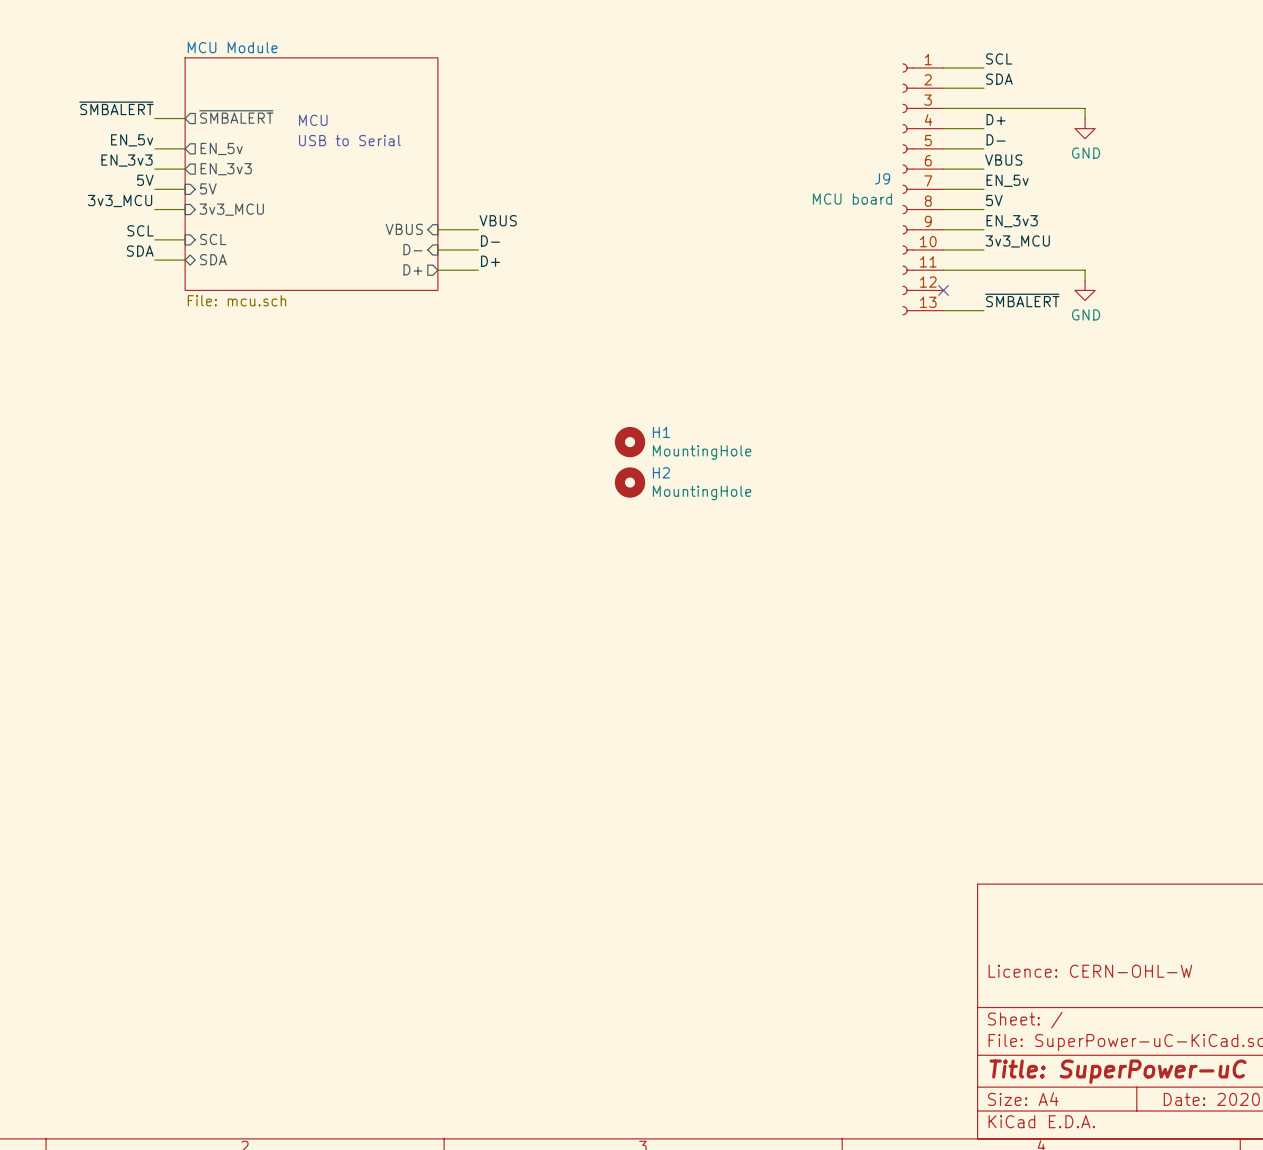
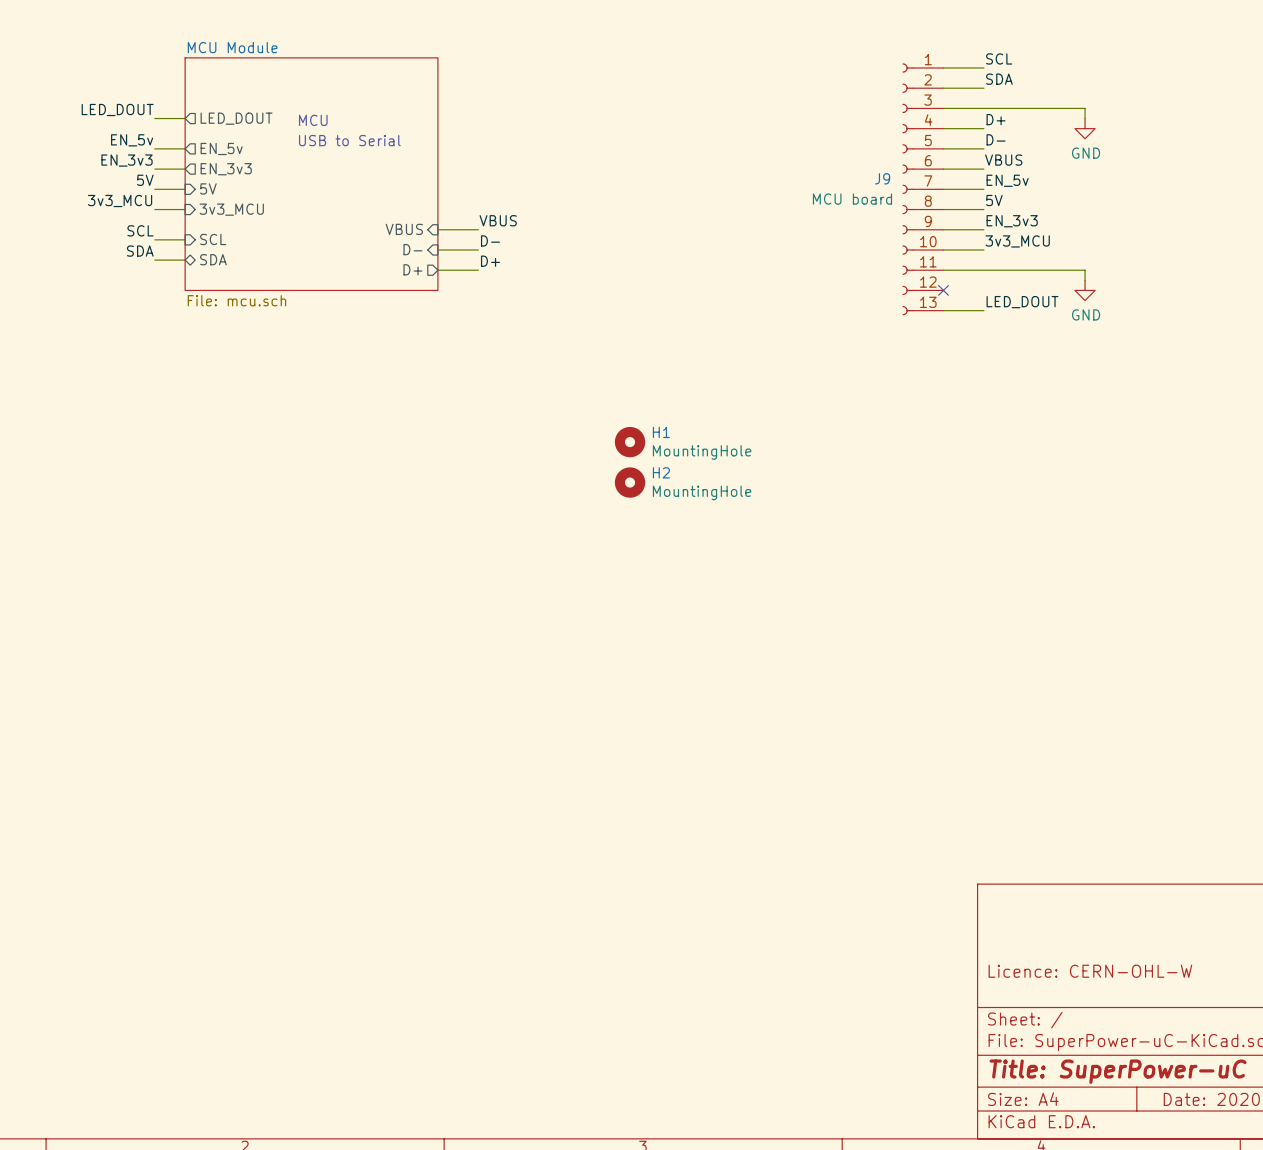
label: ~{SMBALERT} (116, 108) -> LED_DOUT (117, 110)
sheet pin: ~{SMBALERT} (236, 117) -> LED_DOUT (236, 118)
label: ~{SMBALERT} (1022, 300) -> LED_DOUT (1022, 302)

